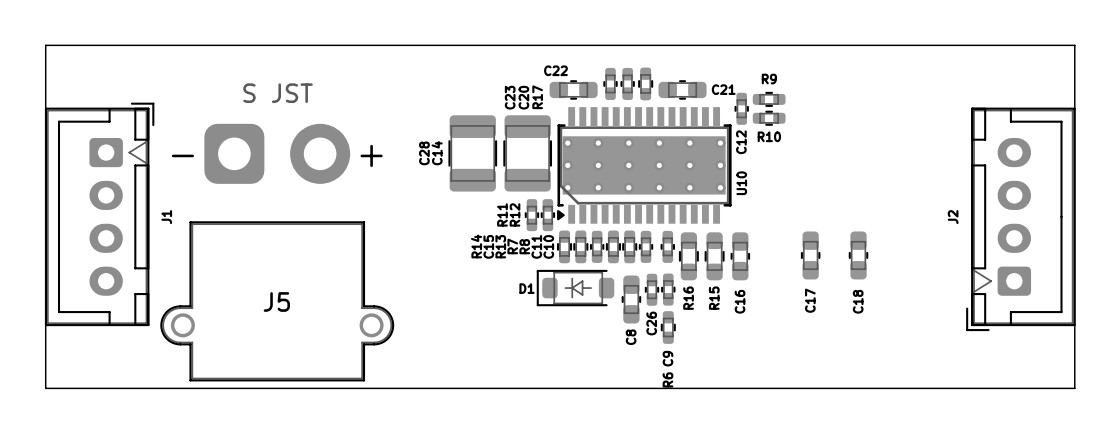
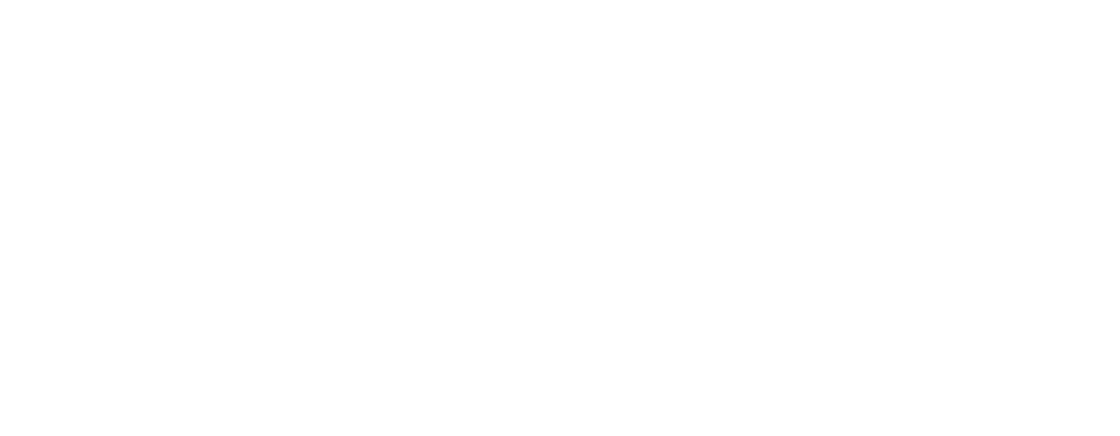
board edge: (45, 45) (1074, 45) (1074, 388) (45, 388) (45, 45) -> none
C23: (610, 83) -> none
C20: (627, 83) -> none
R17: (645, 83) -> none
C22: (573, 89) -> none
C21: (682, 89) -> none
R9: (769, 99) -> none
C12: (741, 108) -> none
R10: (769, 118) -> none
C28: (472, 153) -> none
C14: (527, 153) -> none
U10: (644, 165) -> none
J1: (99, 214) -> none
R11: (531, 215) -> none
R12: (547, 215) -> none
J2: (1020, 219) -> none
R14: (564, 246) -> none
C15: (580, 246) -> none
R13: (597, 246) -> none
R7: (613, 246) -> none
R8: (629, 246) -> none
C11: (646, 246) -> none
C10: (667, 246) -> none
J5: S JST (277, 252) -> none
C17: (810, 255) -> none
C18: (858, 255) -> none
R16: (688, 256) -> none
R15: (714, 256) -> none
C16: (740, 256) -> none
D1: (575, 288) -> none
C26: (652, 289) -> none
C9: (668, 289) -> none
C8: (631, 299) -> none
R6: (668, 327) -> none

